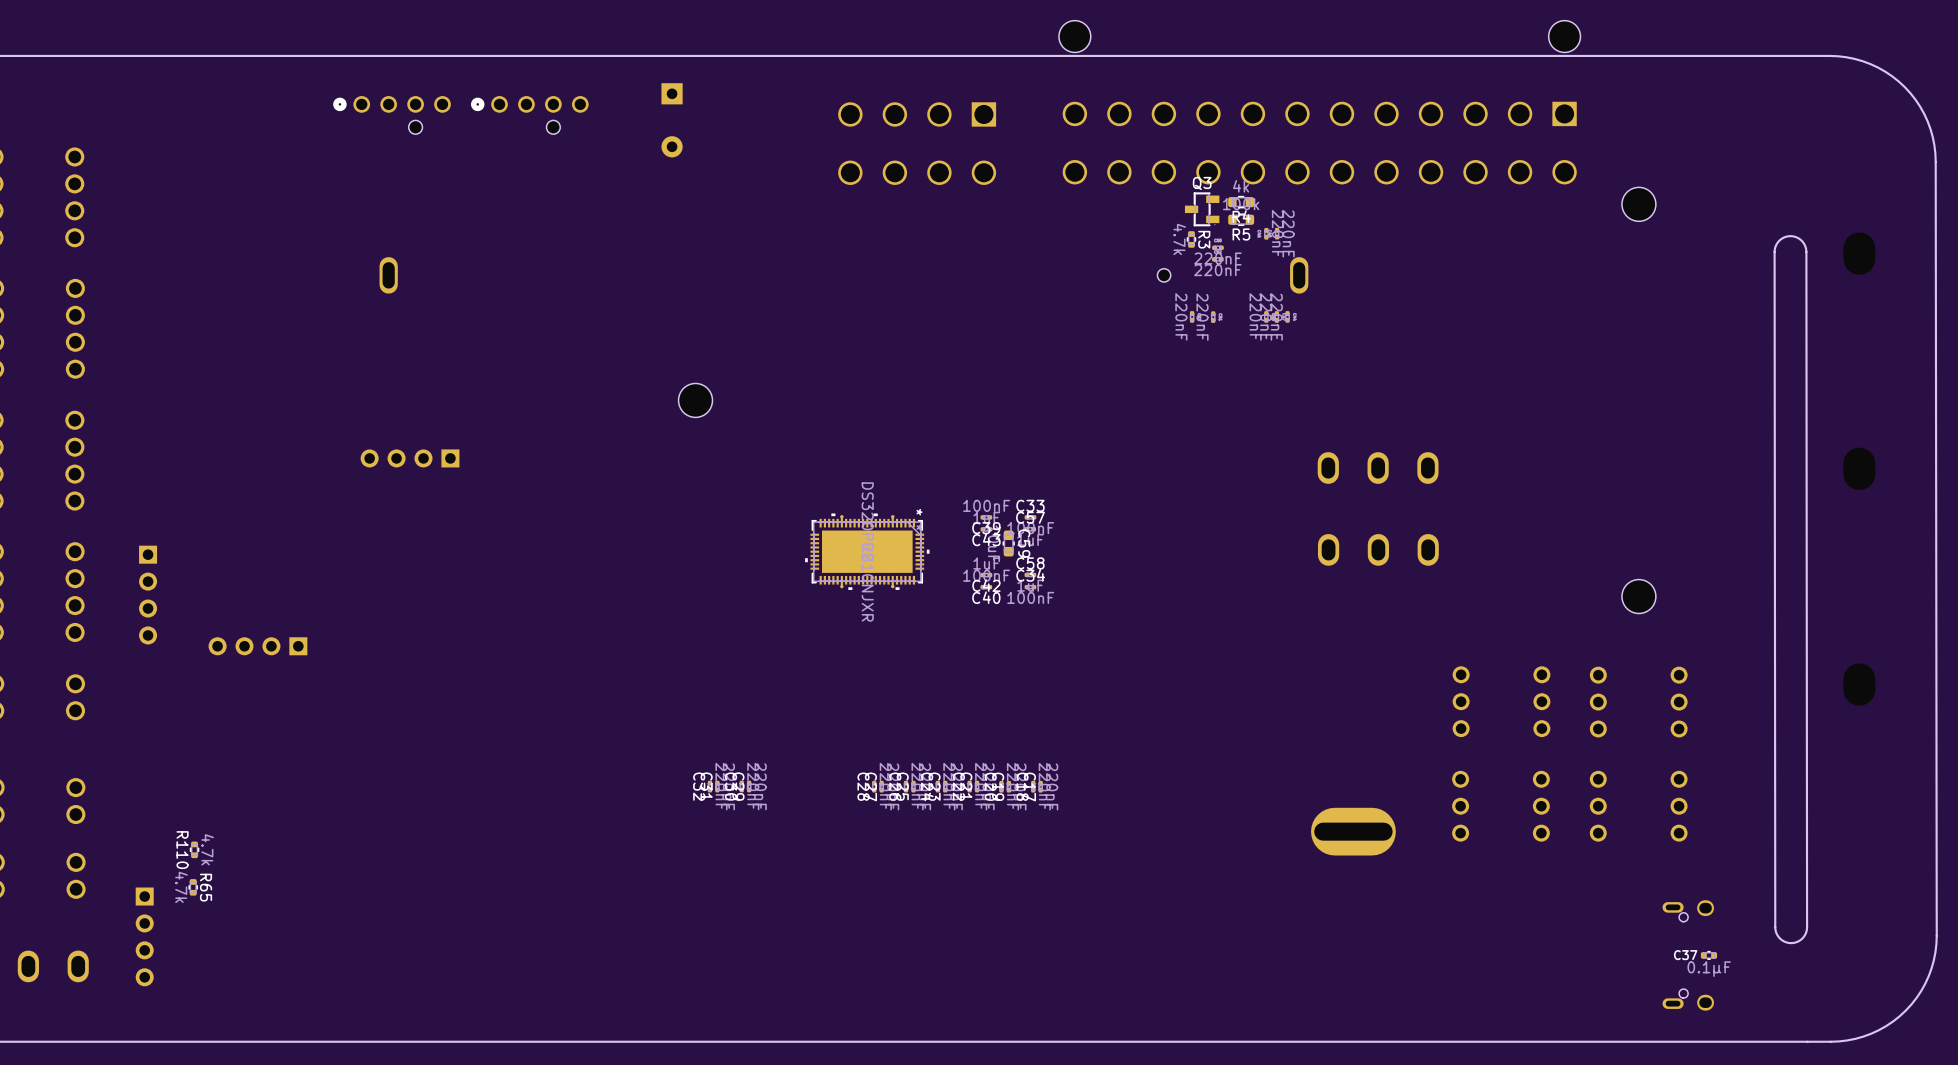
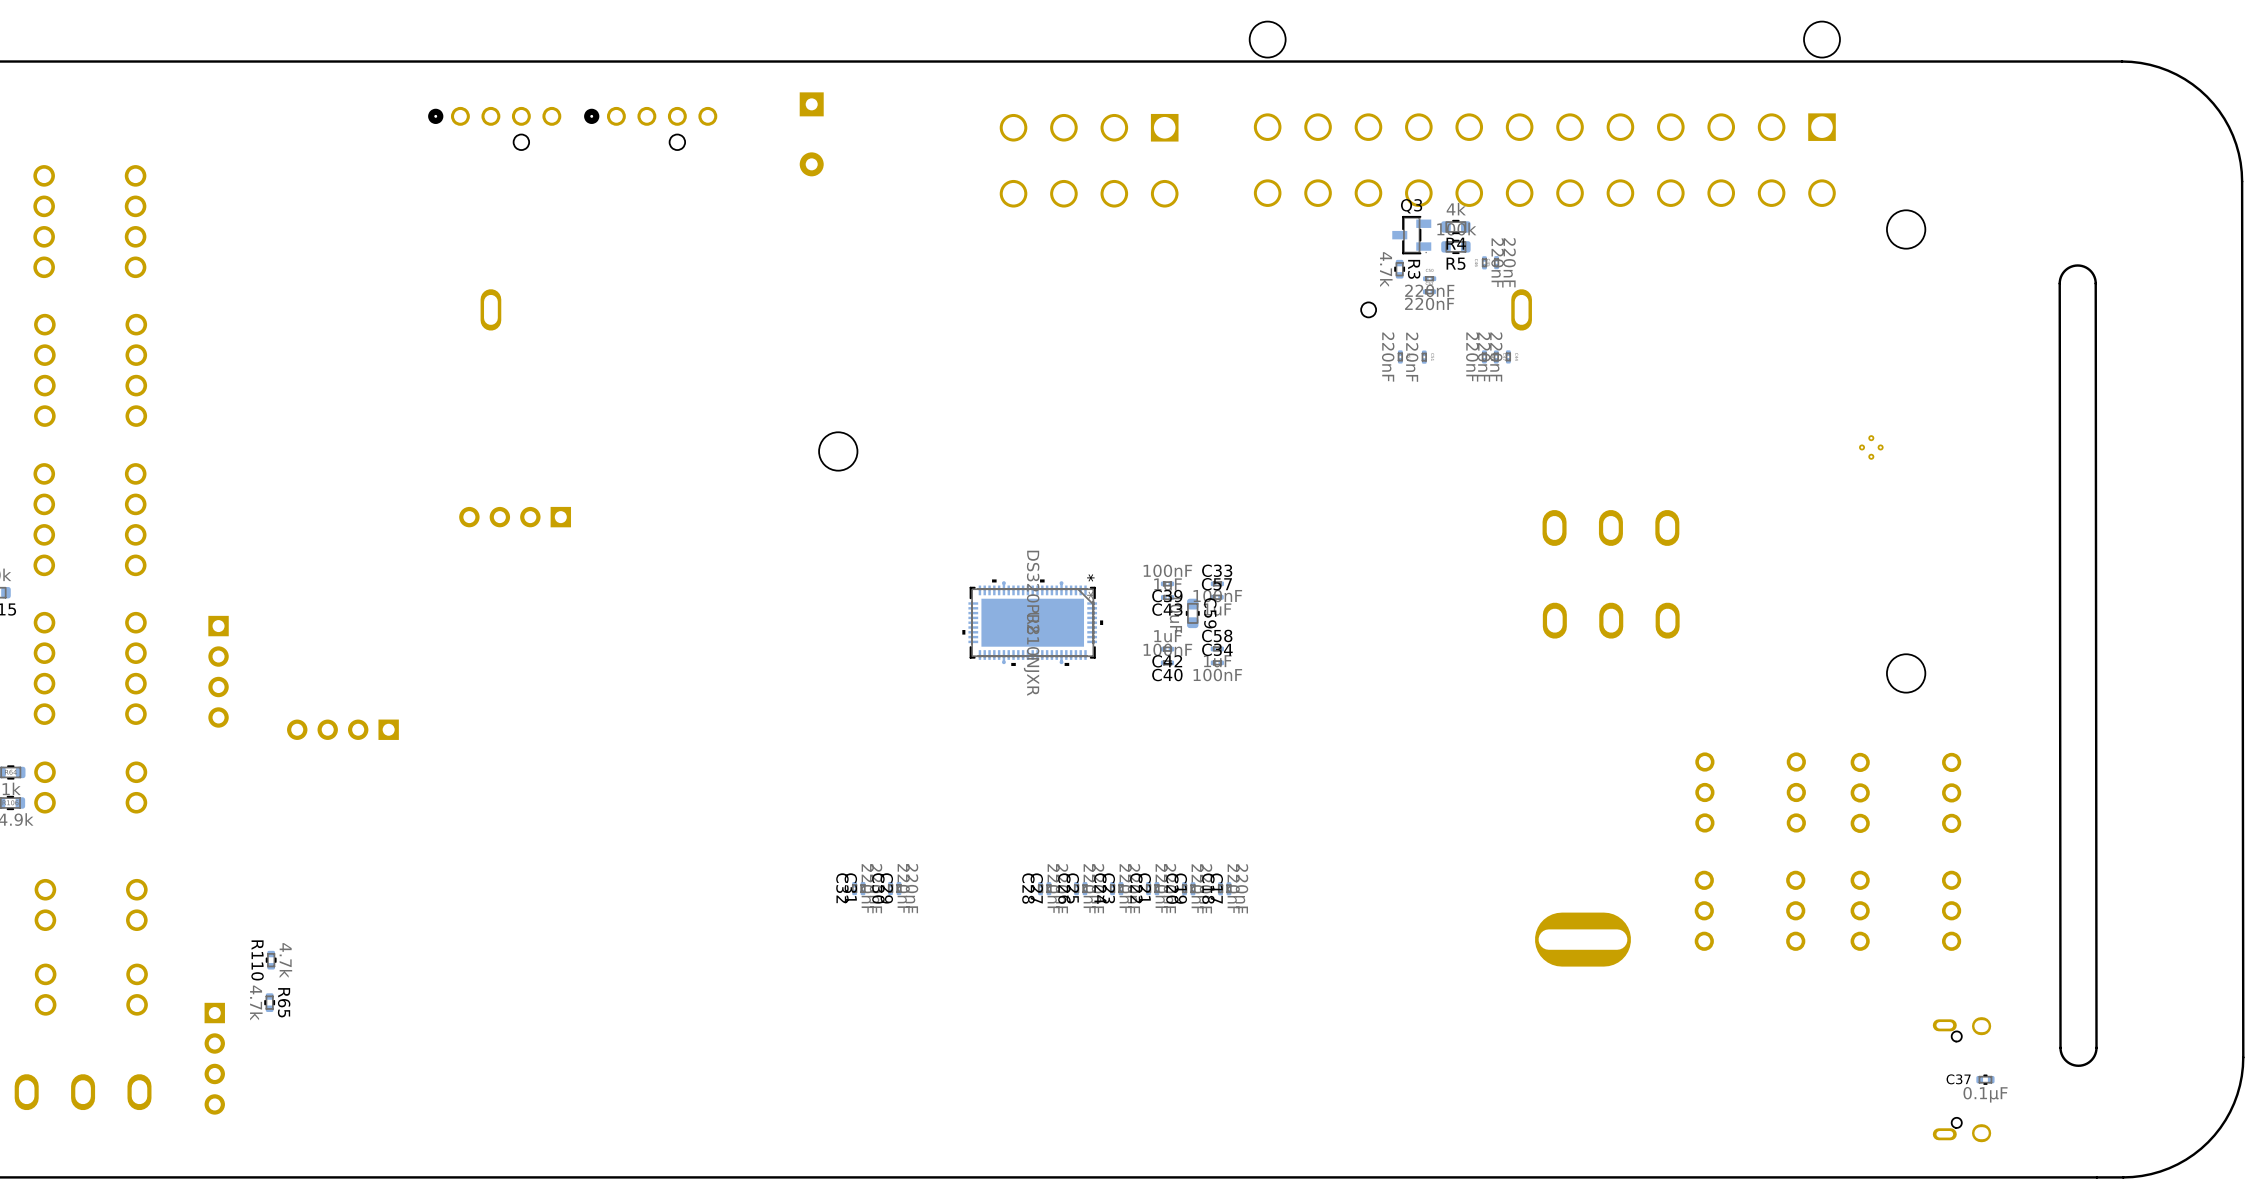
part: none -> (1871, 447)

